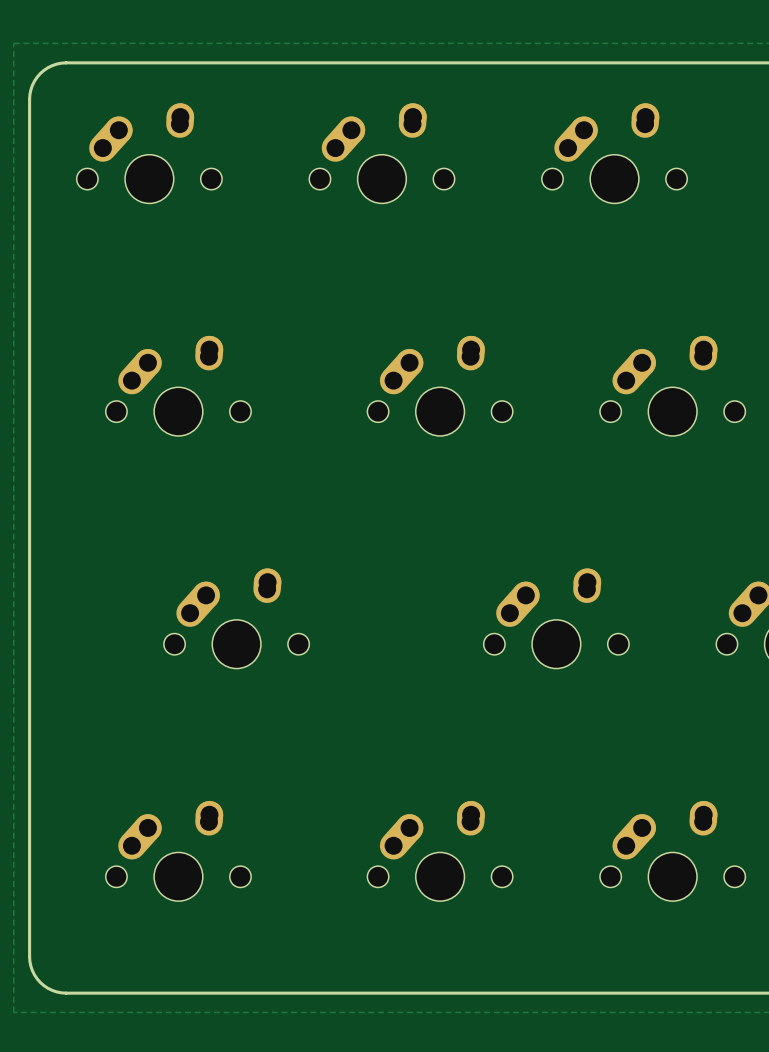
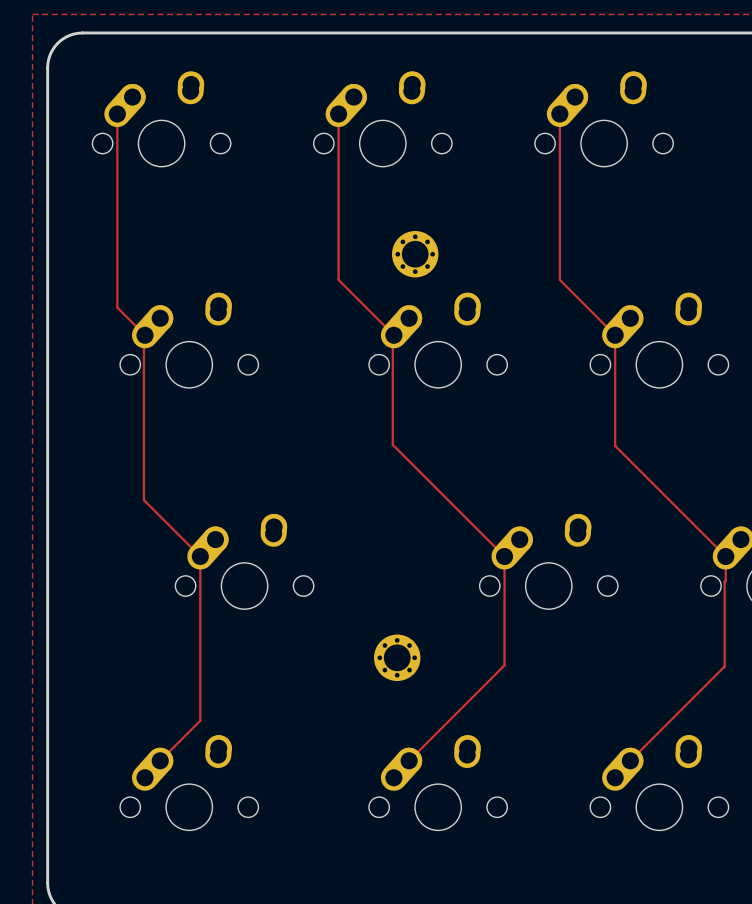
track: none -> (117, 114) (117, 307) (145, 335) (143, 500) (200, 556) (200, 720) (160, 760)
track: none -> (338, 114) (338, 279) (393, 335) (392, 444) (504, 556) (504, 665) (393, 777)
track: none -> (559, 114) (559, 279) (615, 335) (615, 445) (725, 556) (724, 666) (630, 760)
part: none -> (415, 254)
part: none -> (397, 657)

